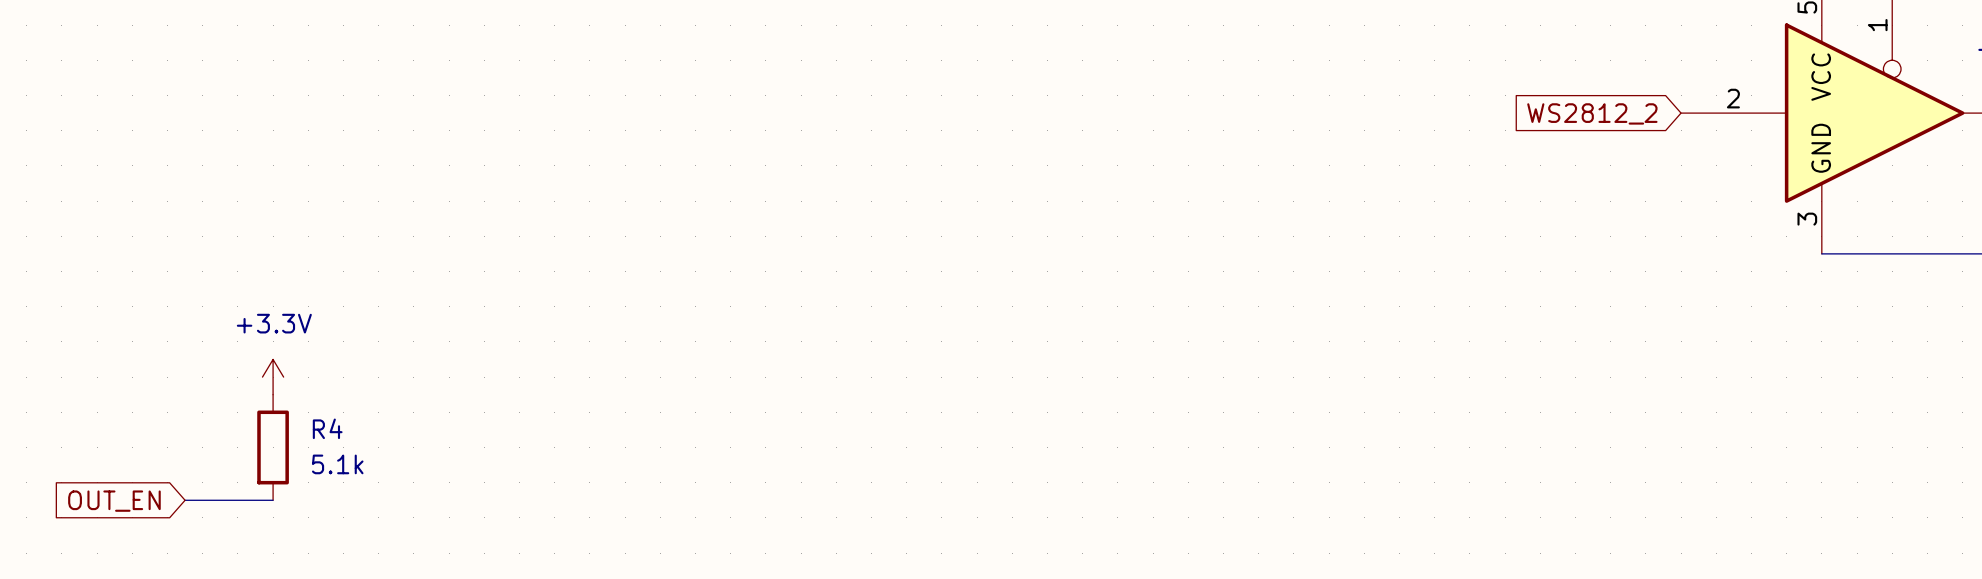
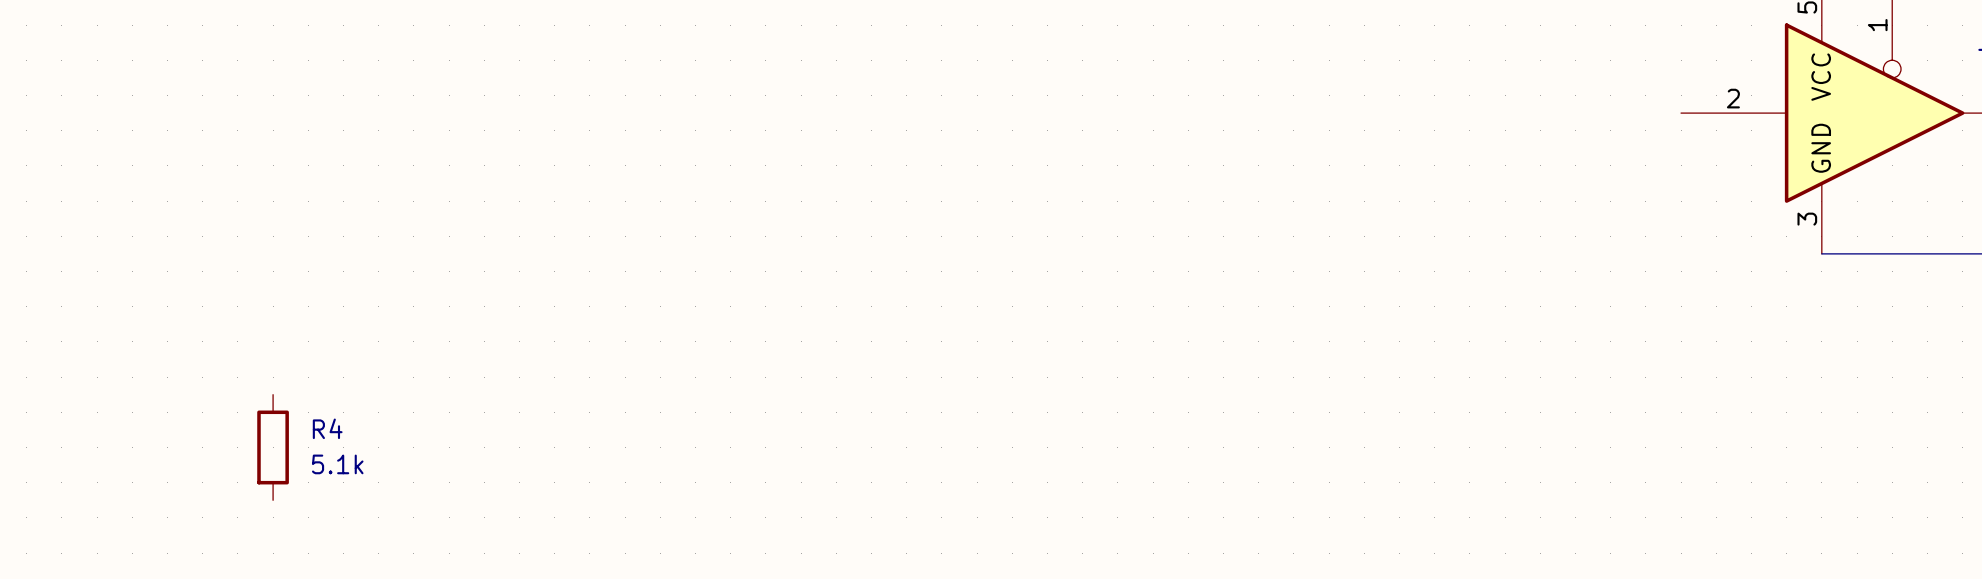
global label: WS2812_2 (1592, 113) -> none
power symbol: +3.3V (273, 377) -> none
wire: (185, 500) (273, 500) -> none
global label: OUT_EN (114, 501) -> none

